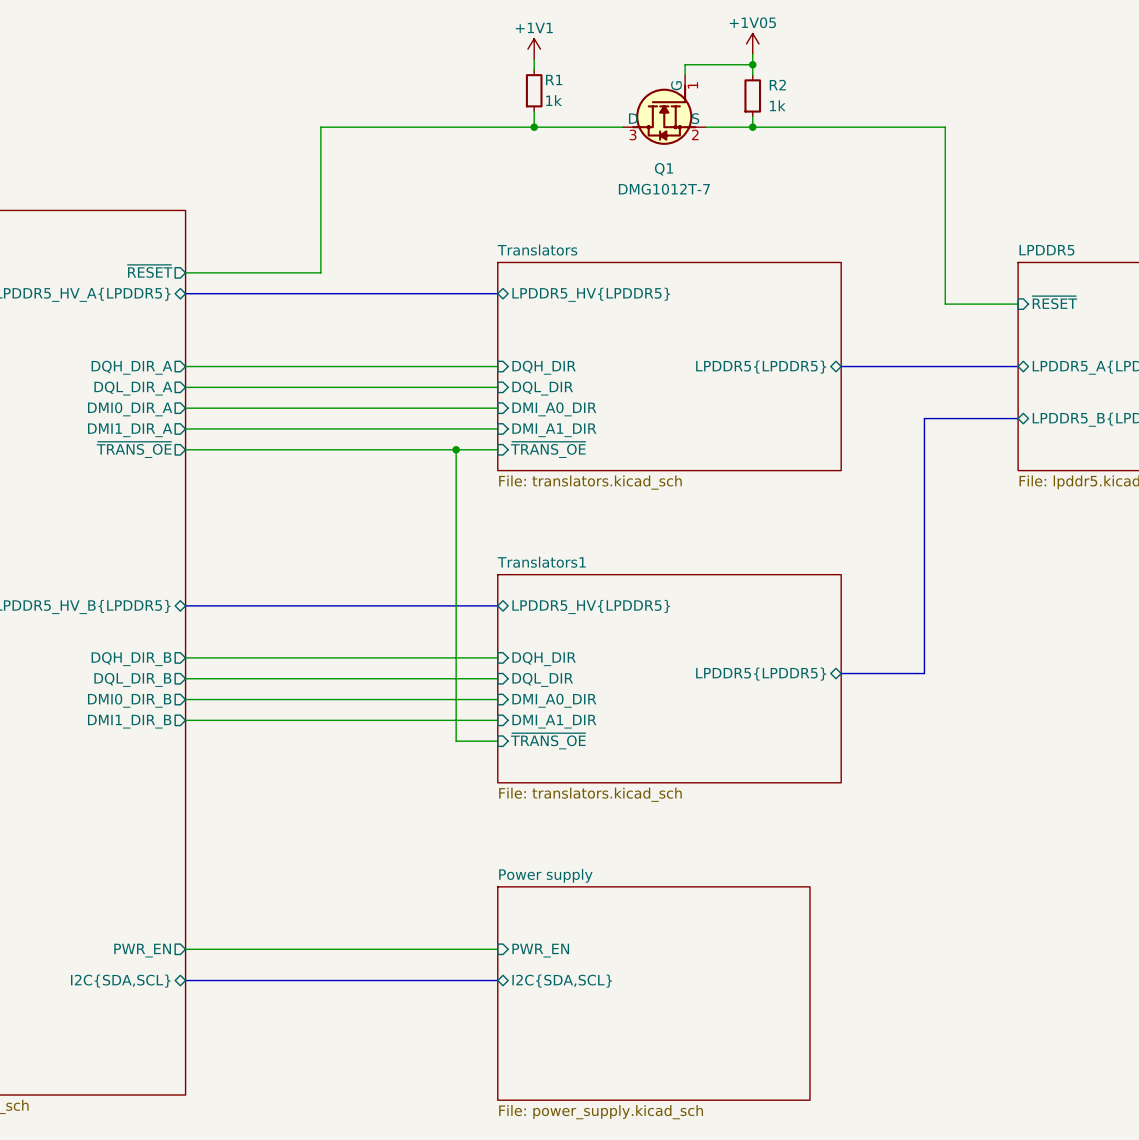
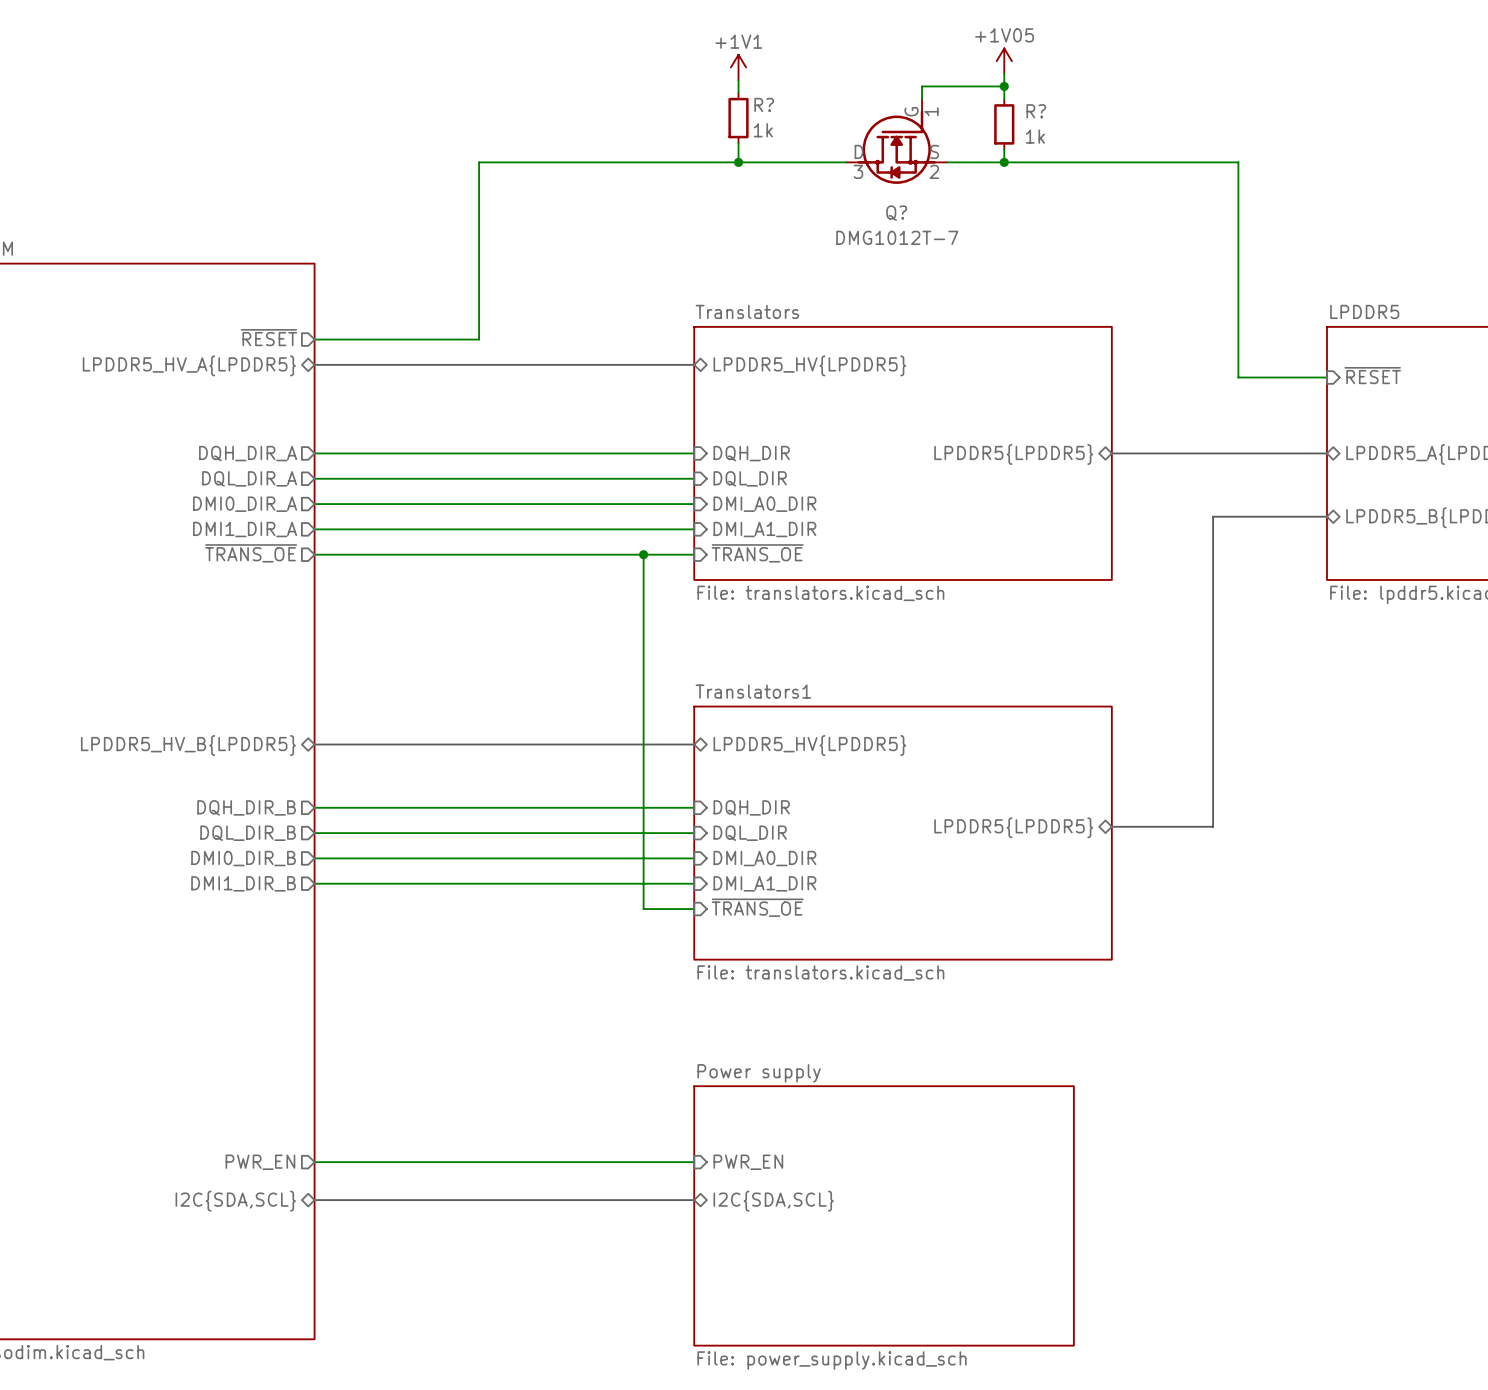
R1 name: R1 (554, 79) -> R? (764, 104)
R2 name: R2 (777, 85) -> R? (1036, 111)
Q1 name: Q1 (664, 169) -> Q? (896, 213)

